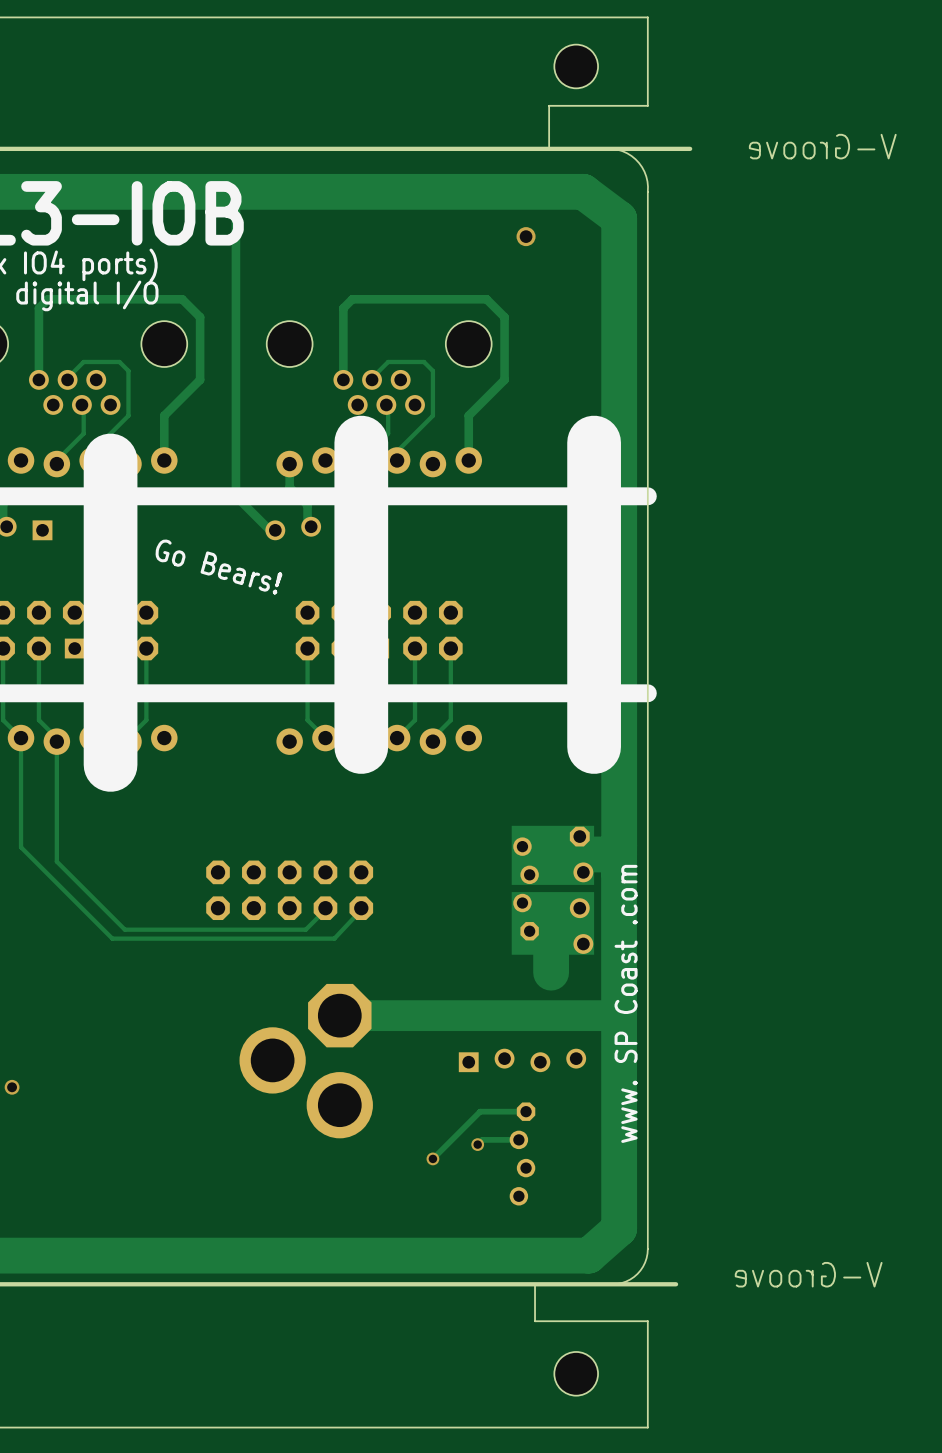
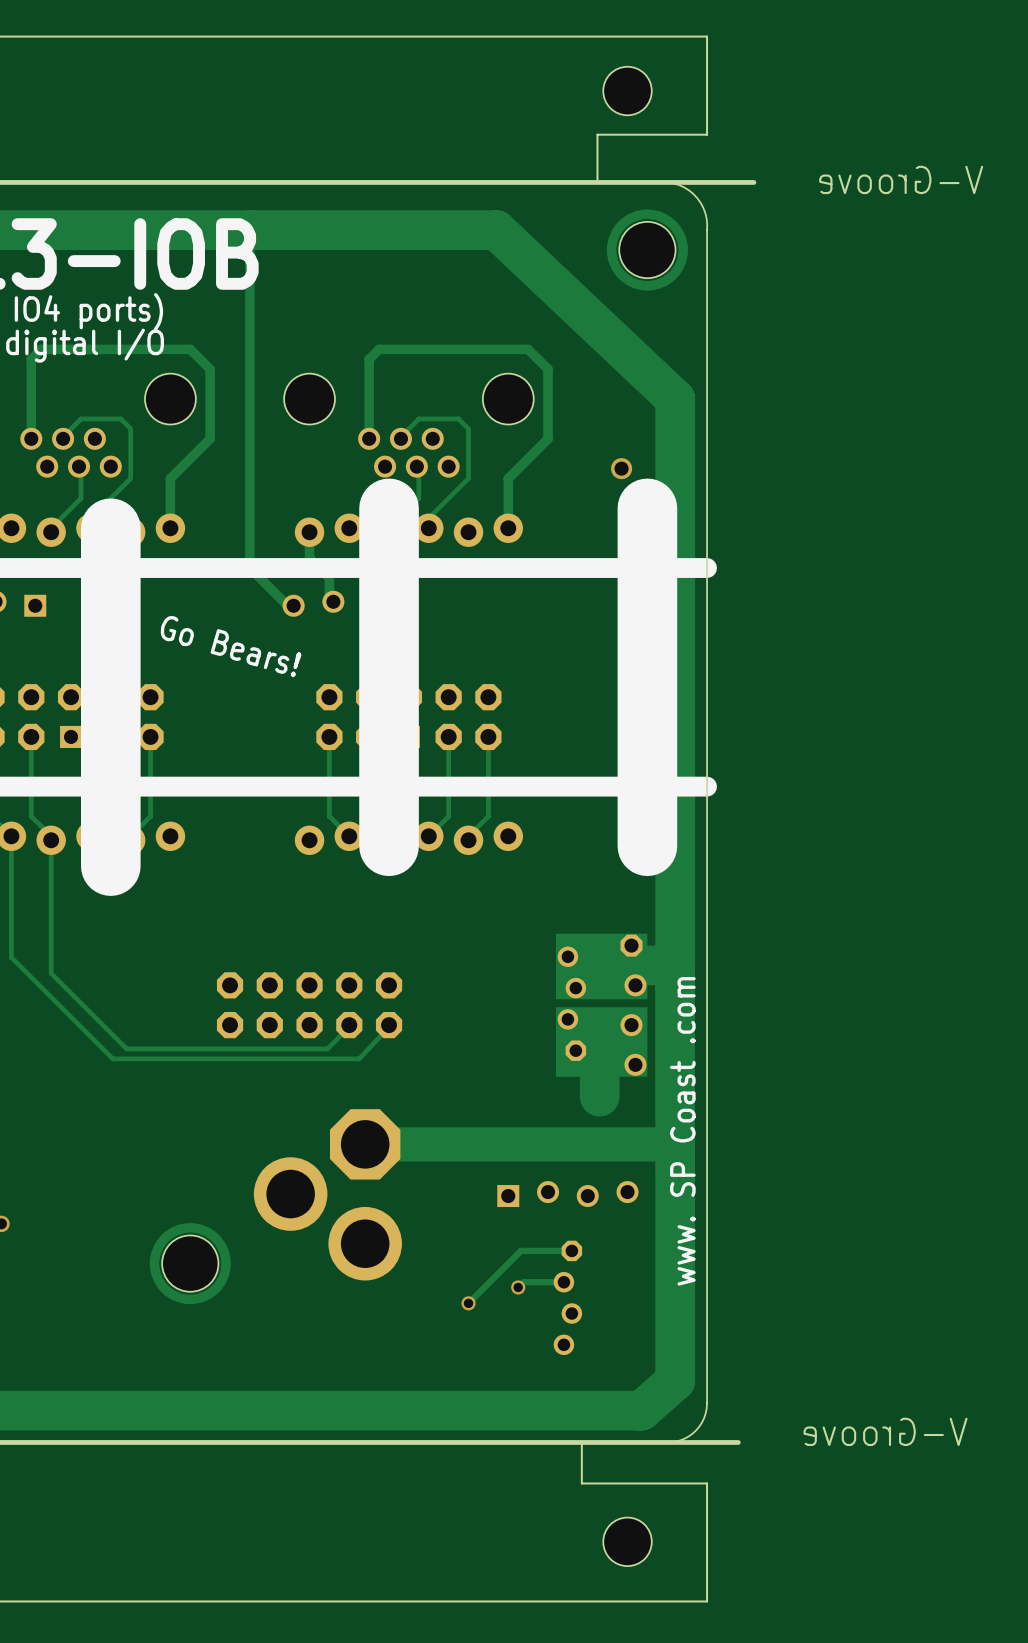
track: (458, 191) (583, 191) (619, 218) (619, 344) -> (496, 230) (675, 399)
part: none -> (647, 250)
via: (526, 236) -> none
via: none -> (621, 468)
part: none -> (190, 1263)

